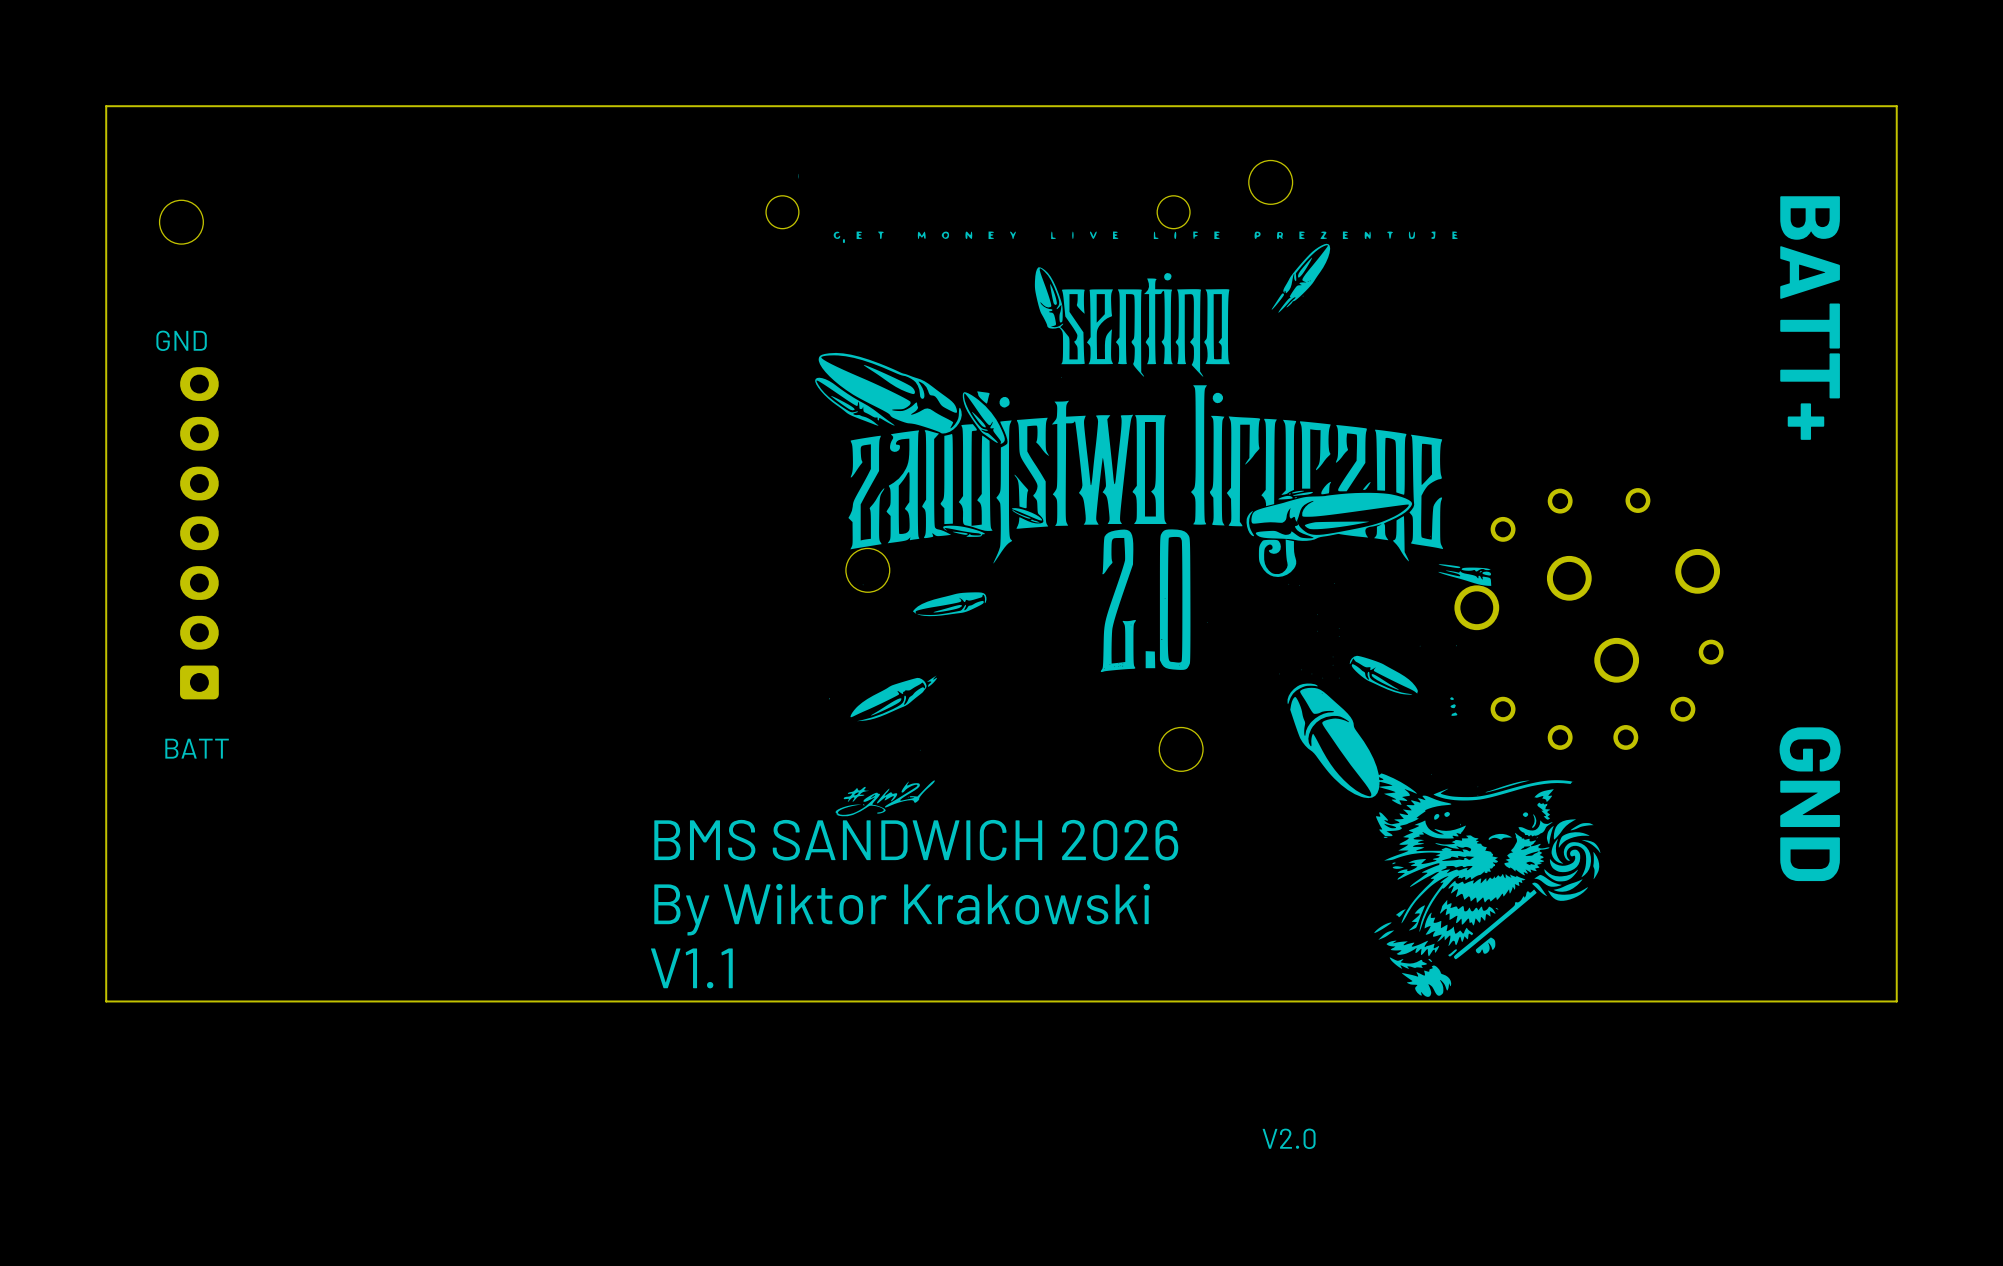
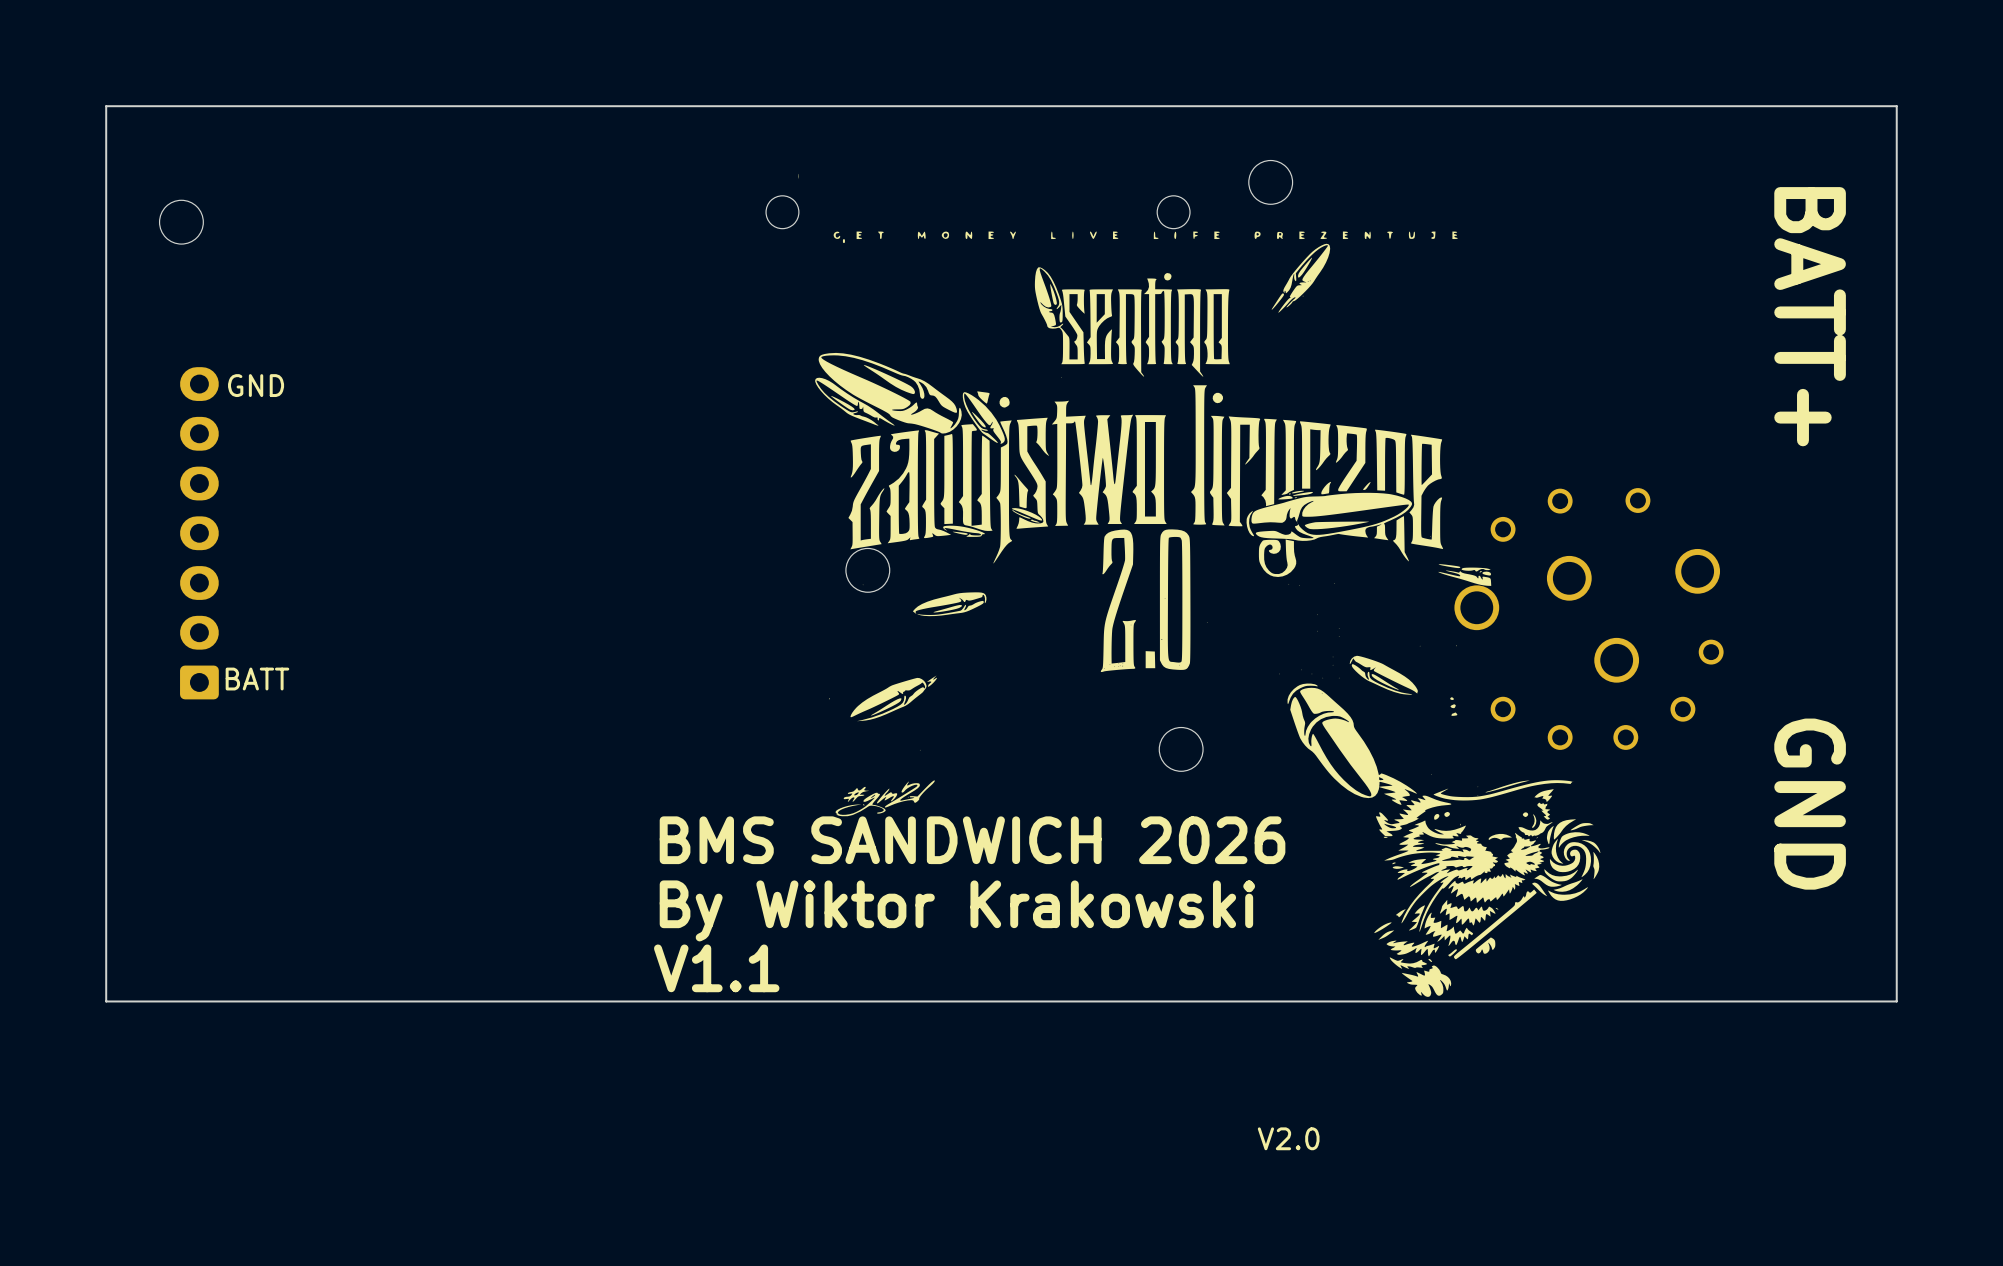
text position: GND (181, 340) -> GND (256, 385)
text position: BATT (197, 748) -> BATT (257, 679)

